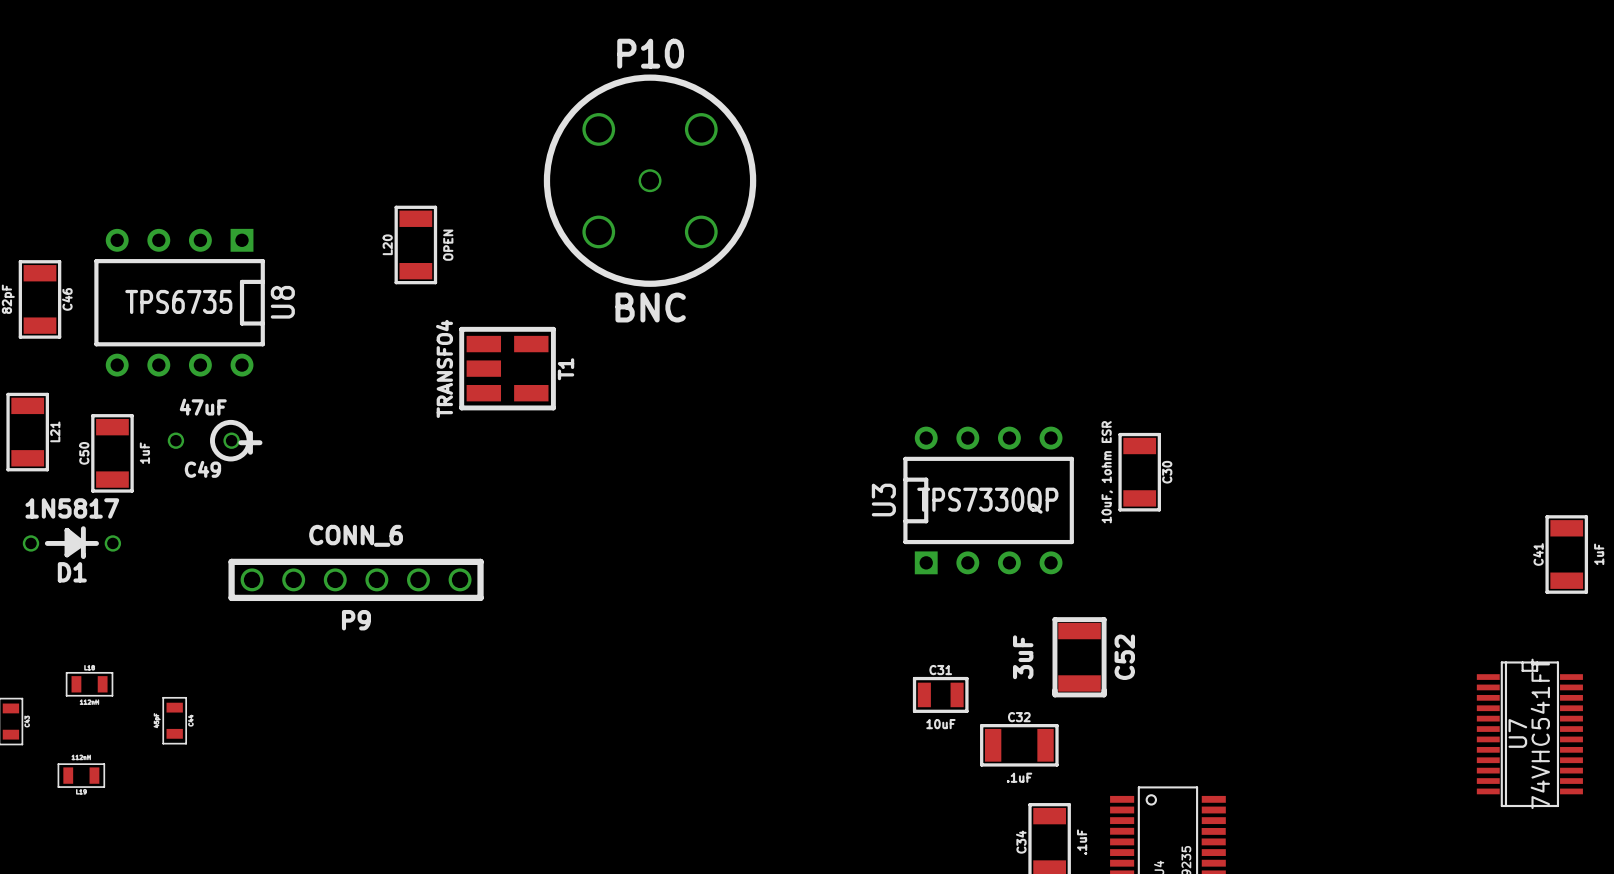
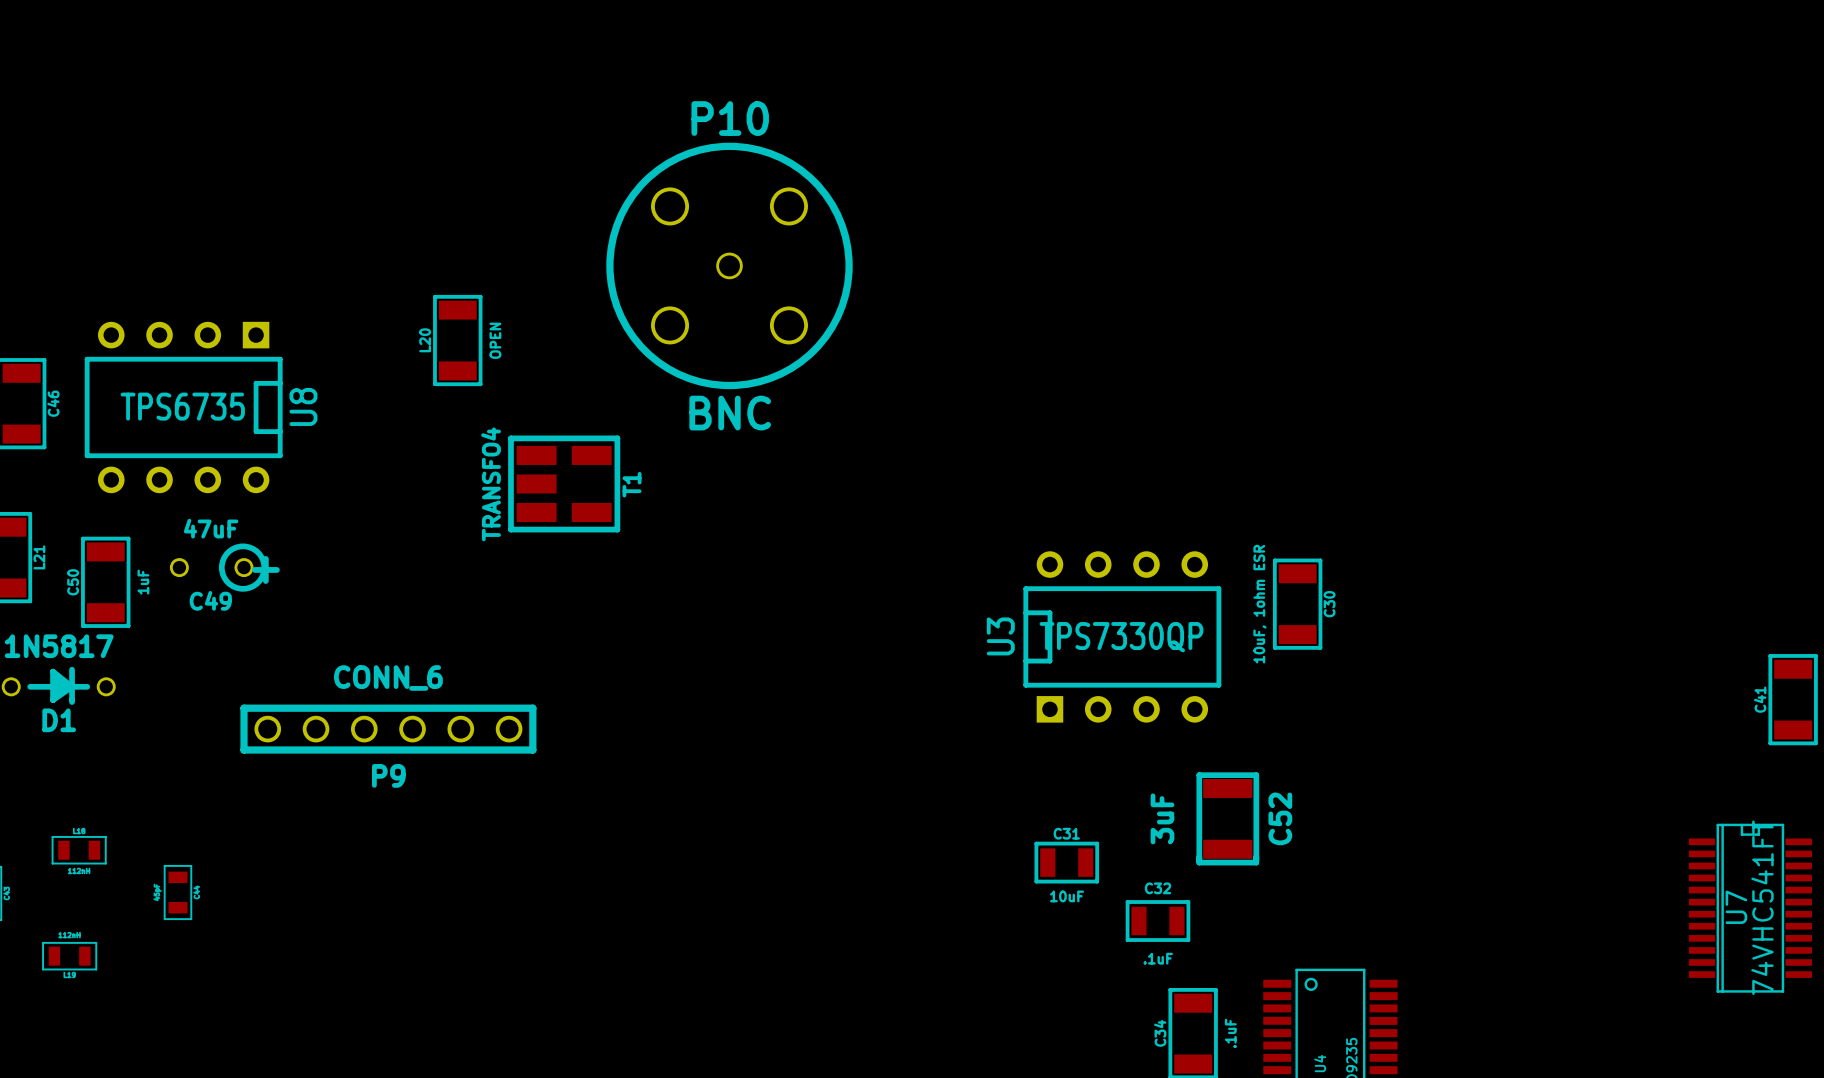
C32 footprint: [980, 724, 1059, 767] -> [1125, 900, 1191, 942]

